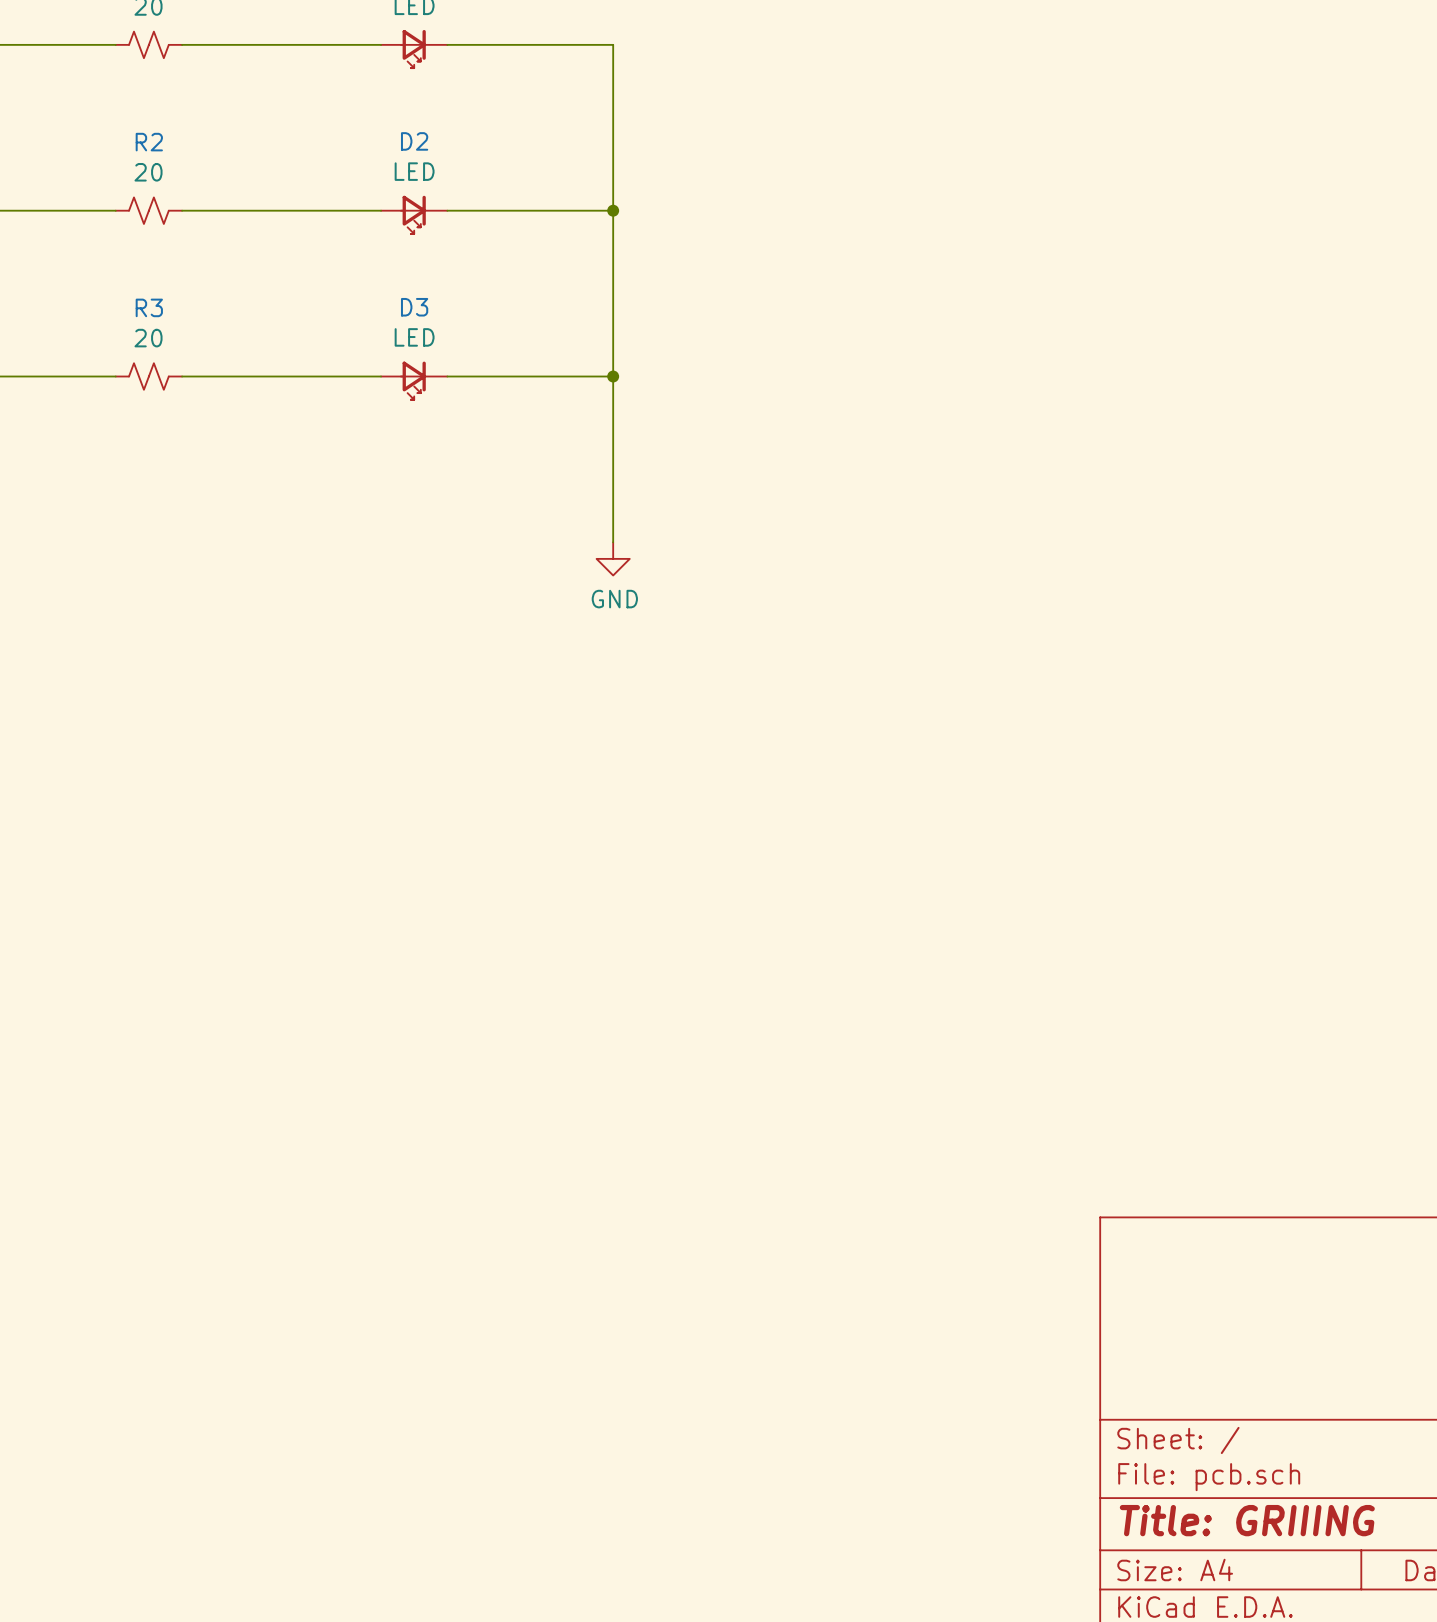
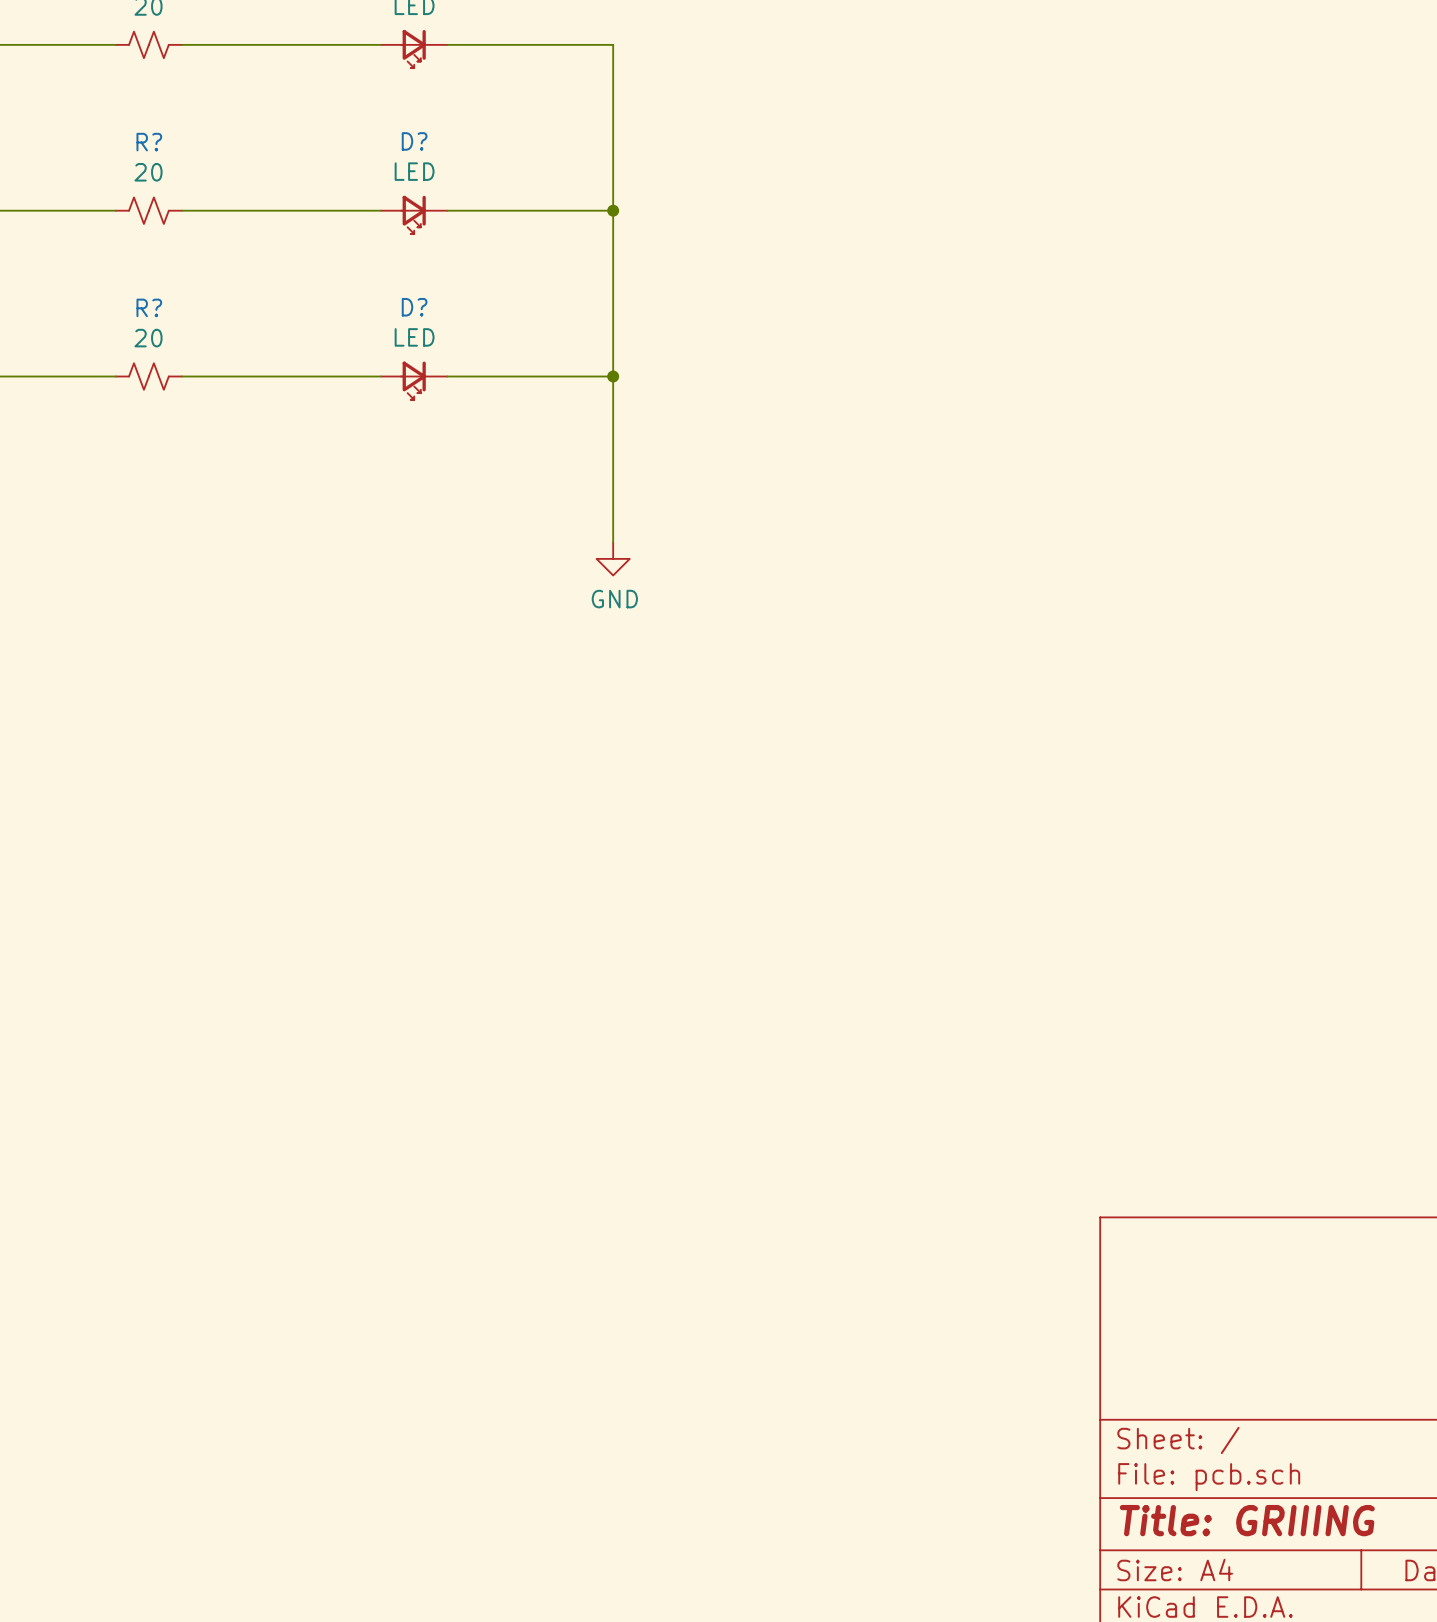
D2 name: D2 (414, 141) -> D? (414, 141)
R2 name: R2 (149, 142) -> R? (149, 142)
R3 name: R3 (149, 307) -> R? (149, 307)
D3 name: D3 (414, 307) -> D? (414, 307)

